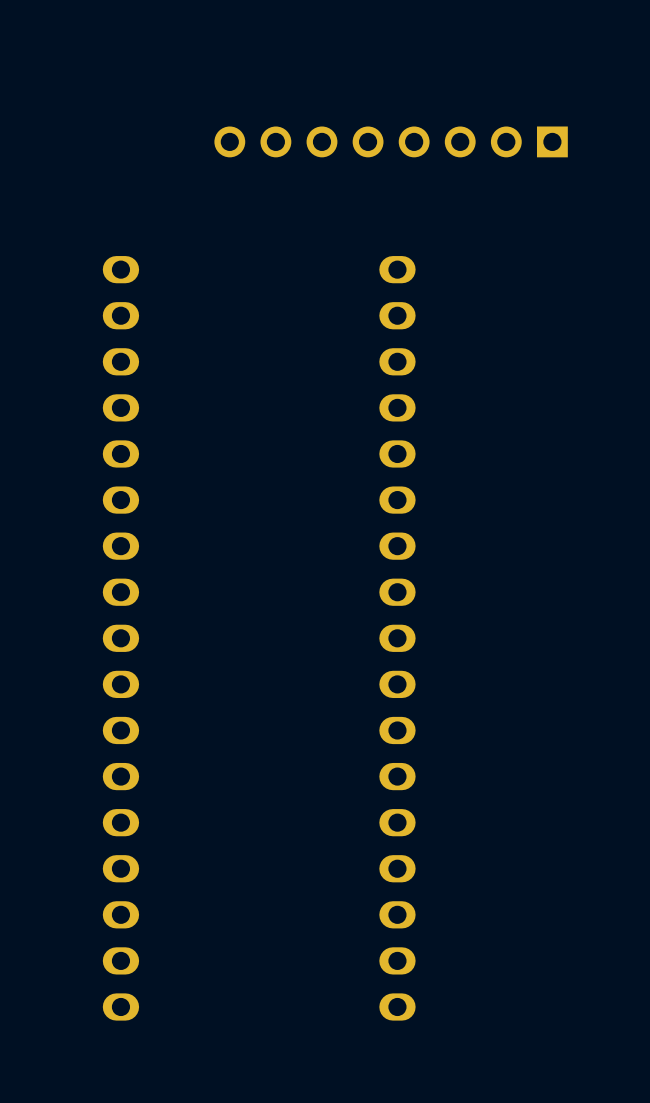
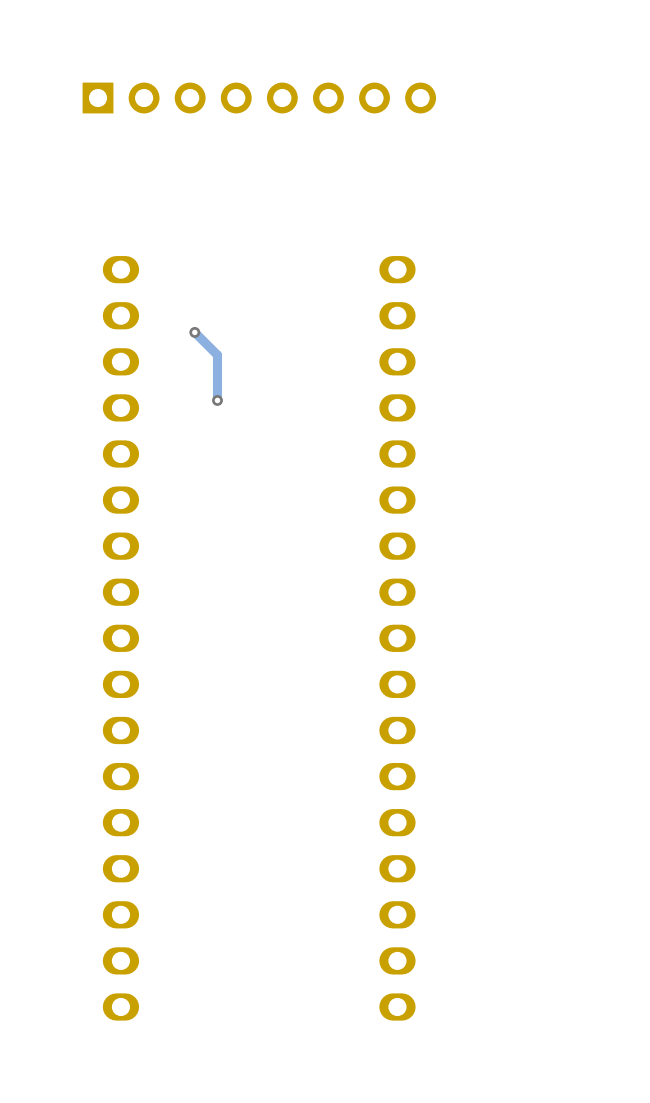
part rotation: 0° (391, 141) -> 180° (259, 98)
track: none -> (194, 332) (217, 355) (217, 400)
via: none -> (194, 332)
via: none -> (217, 400)

